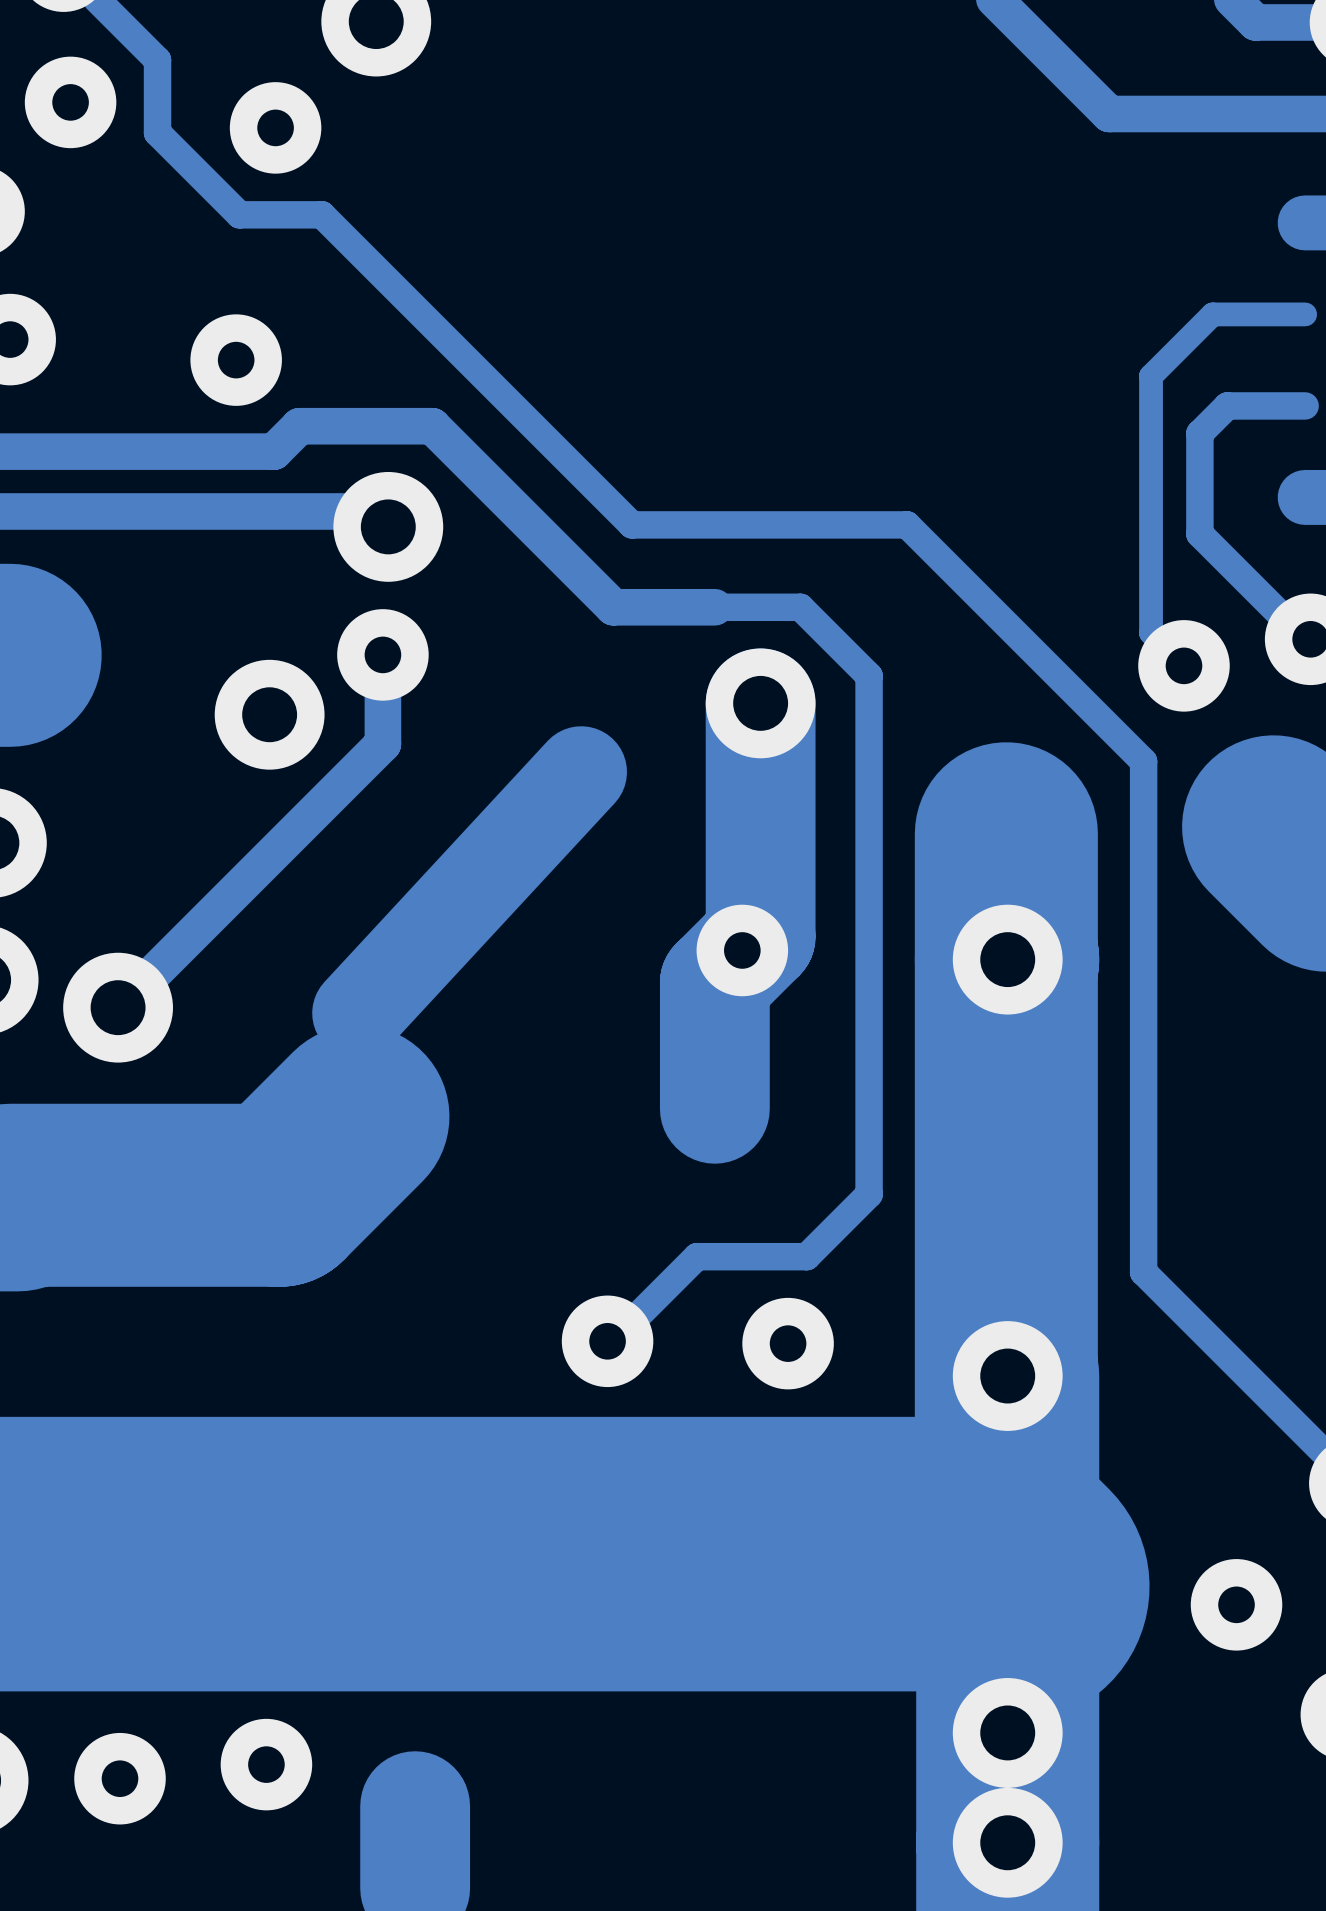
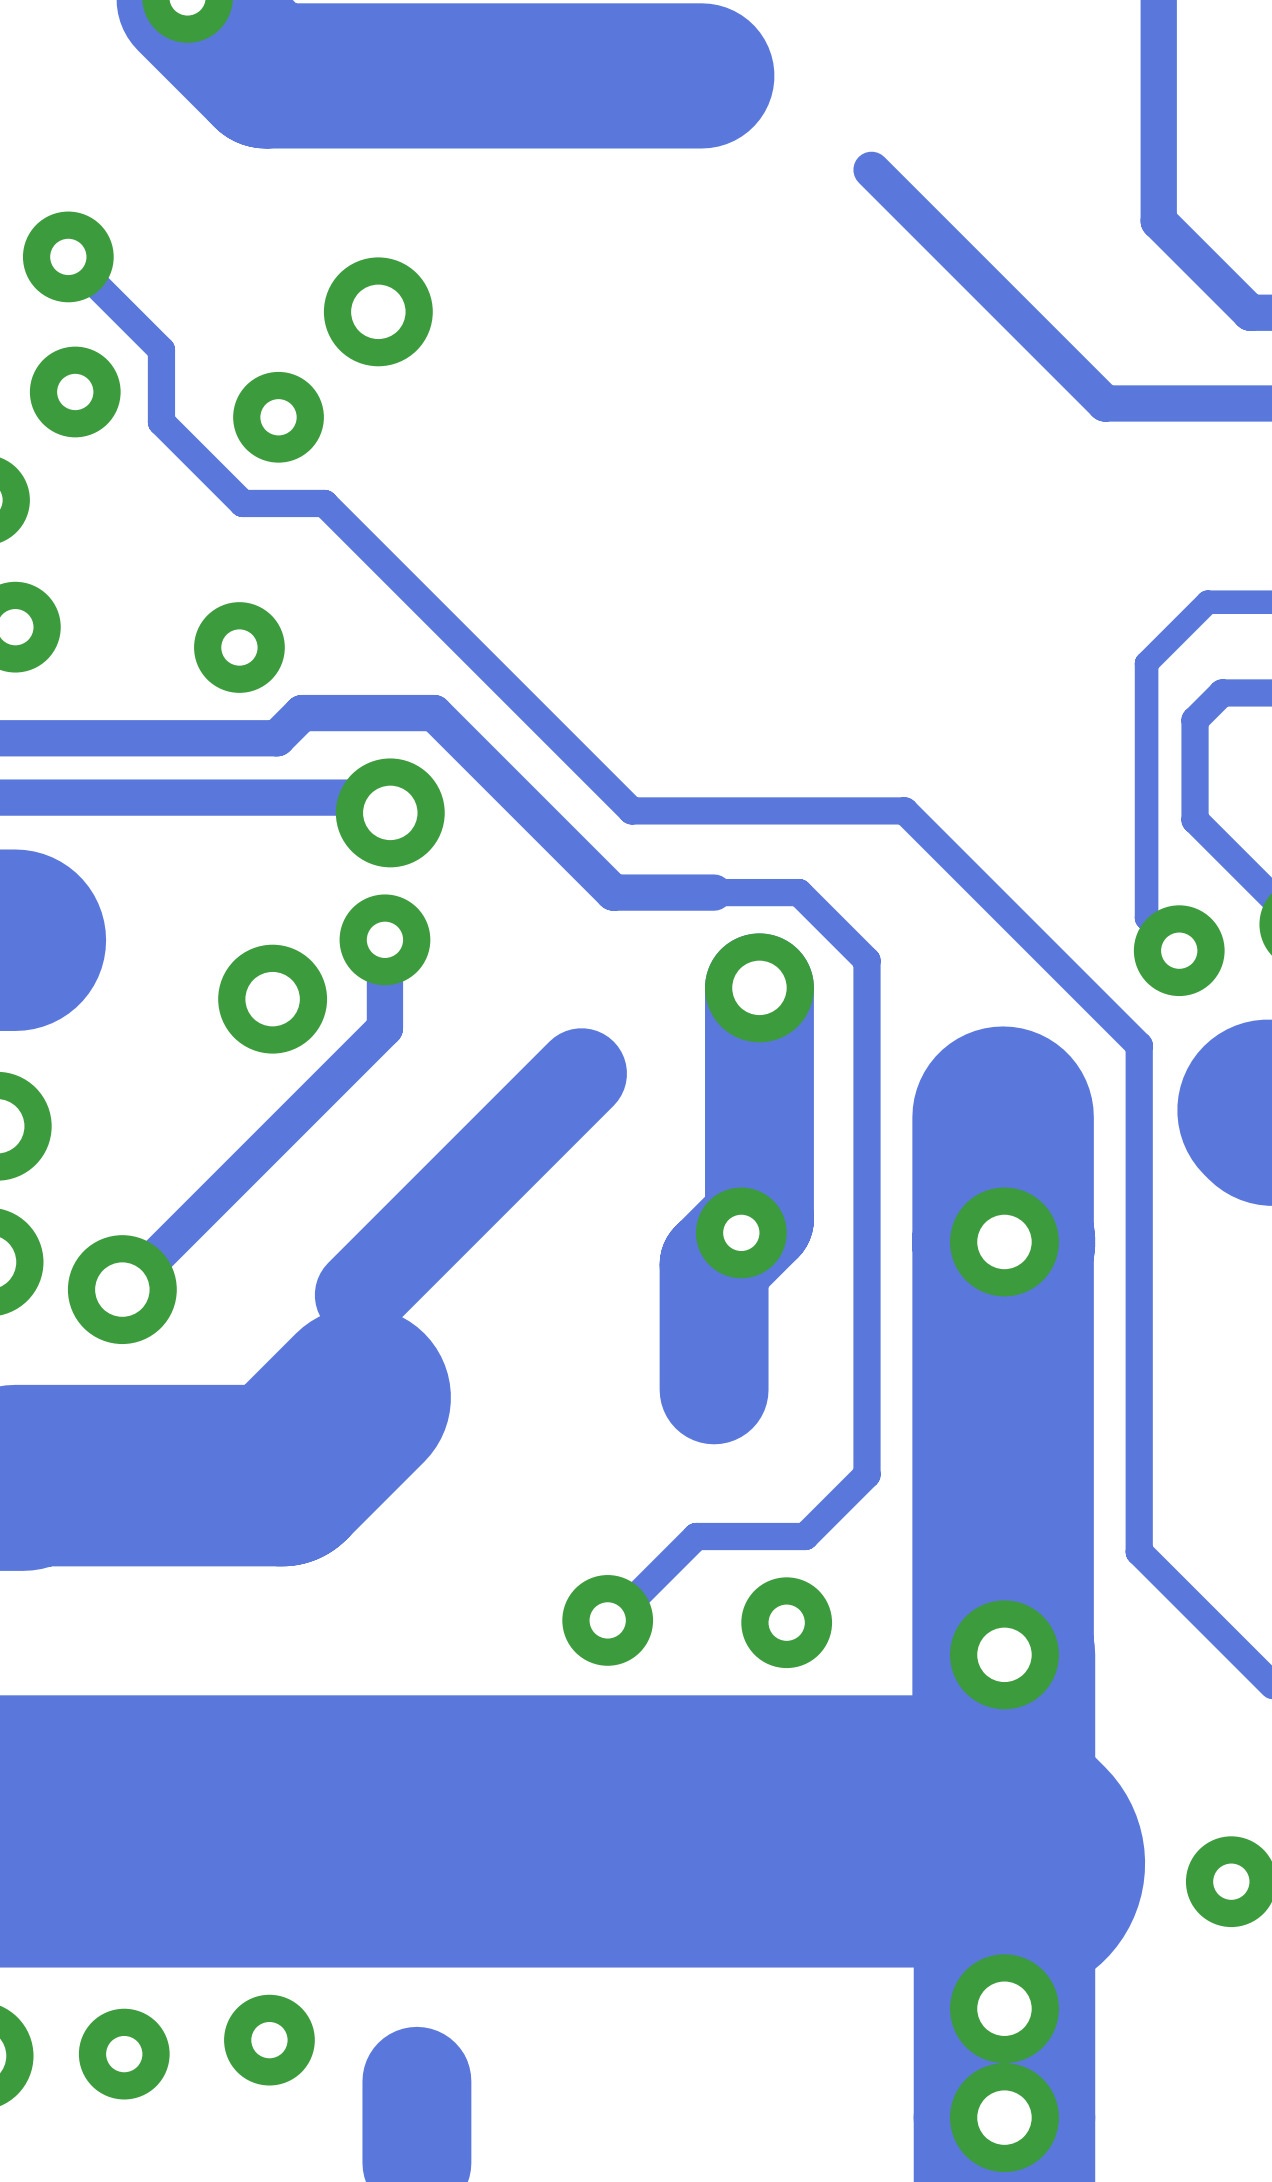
track: (581, 772) (357, 1013) -> (581, 1073) (360, 1295)

